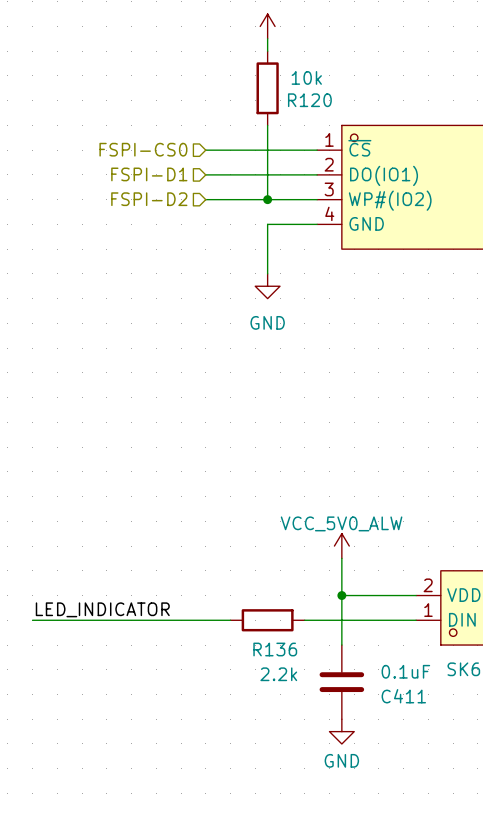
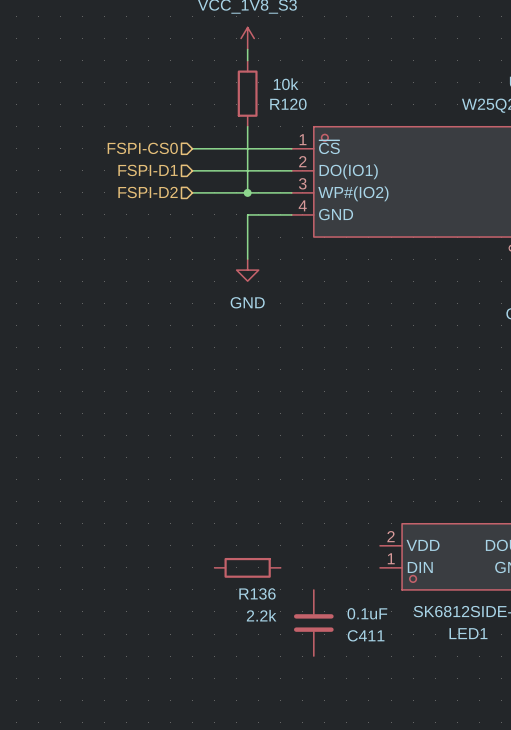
power symbol: VCC_5V0_ALW (341, 546) -> none
wire: (341, 558) (341, 645) -> none
wire: (341, 595) (416, 595) -> none
junction: (341, 595) -> none
label: LED_INDICATOR (102, 609) -> none
wire: (32, 620) (230, 620) -> none
wire: (304, 620) (416, 620) -> none
power symbol: GND (341, 731) -> none

